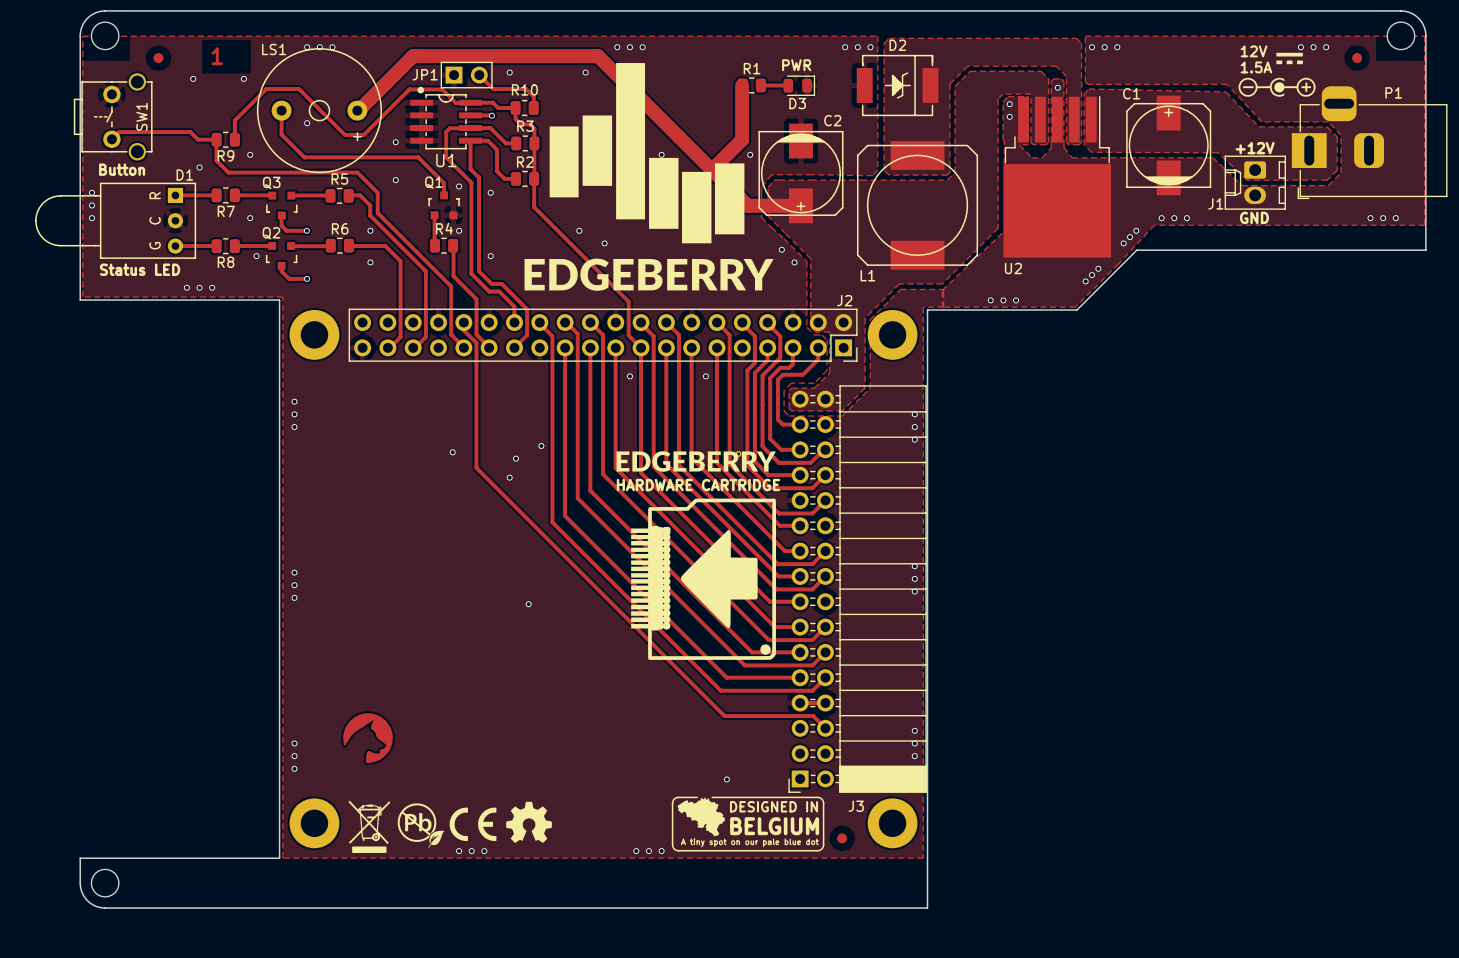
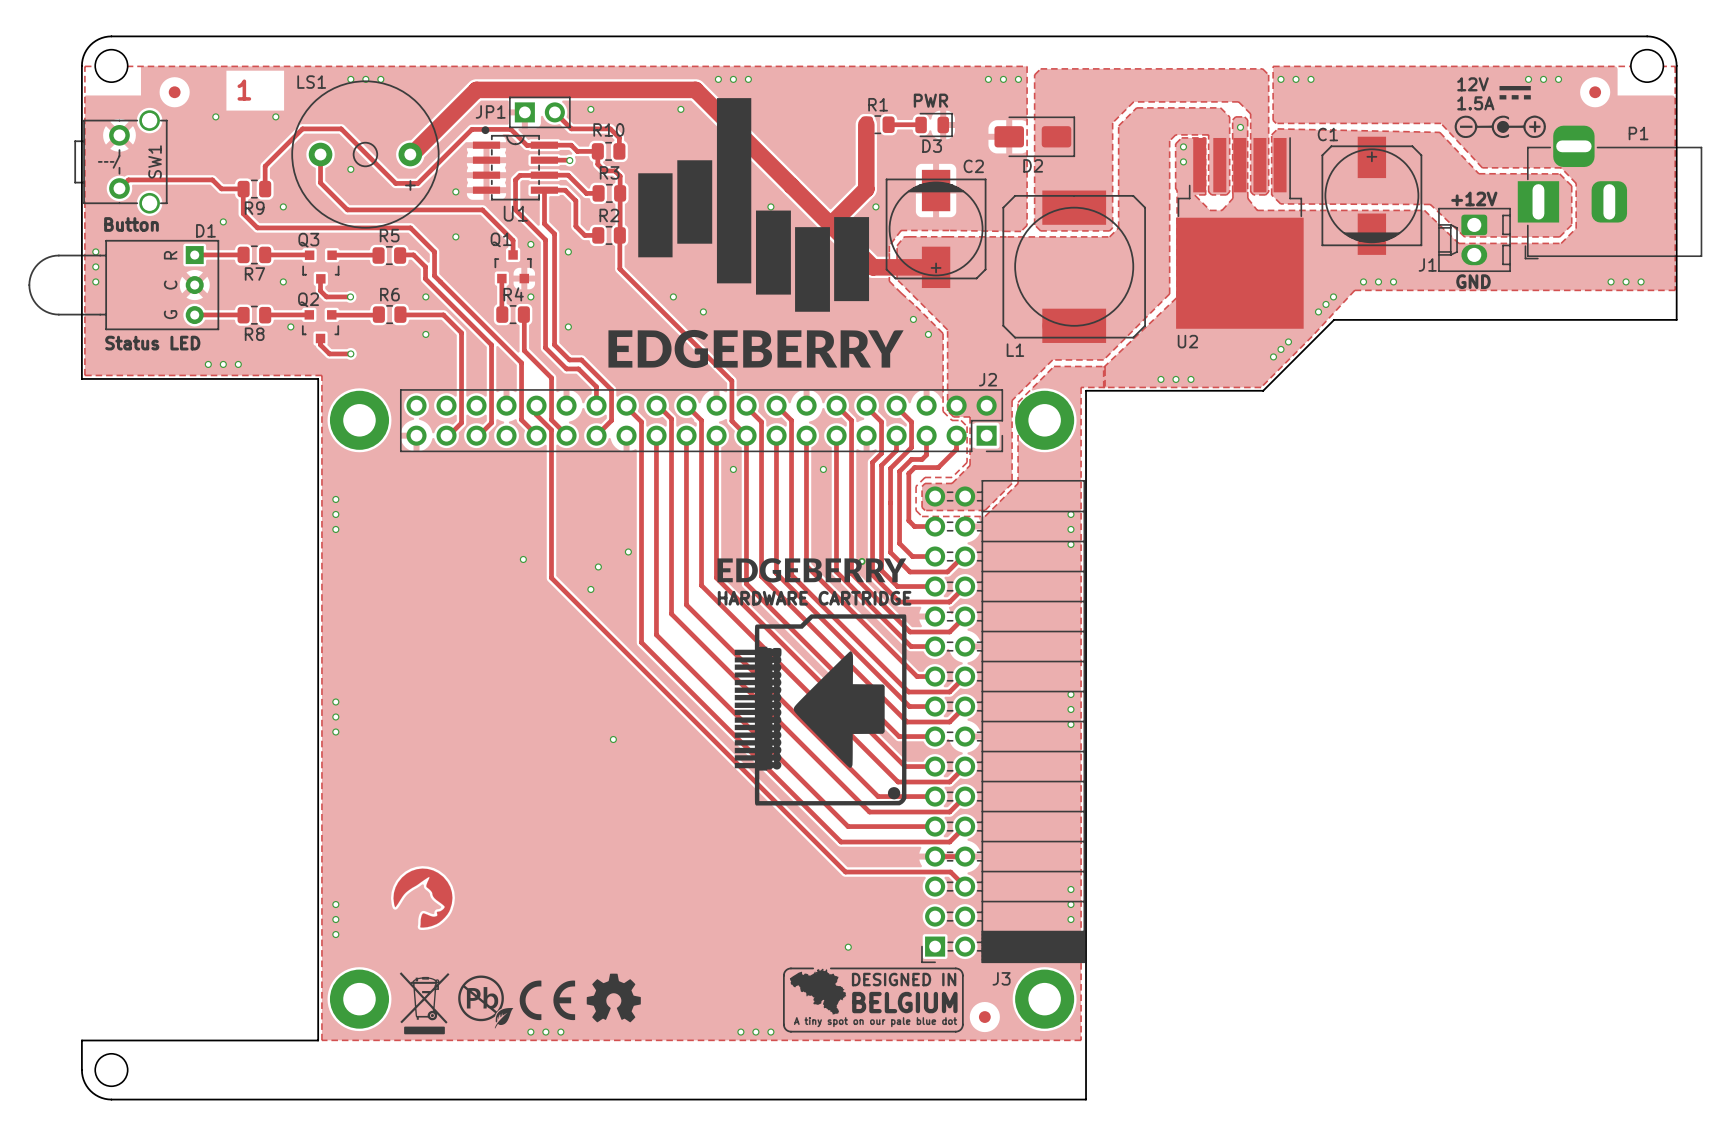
D2 name position: D2 (897, 45) -> D2 (1033, 165)
D2 footprint: [856, 54, 939, 117] -> [994, 116, 1076, 158]

